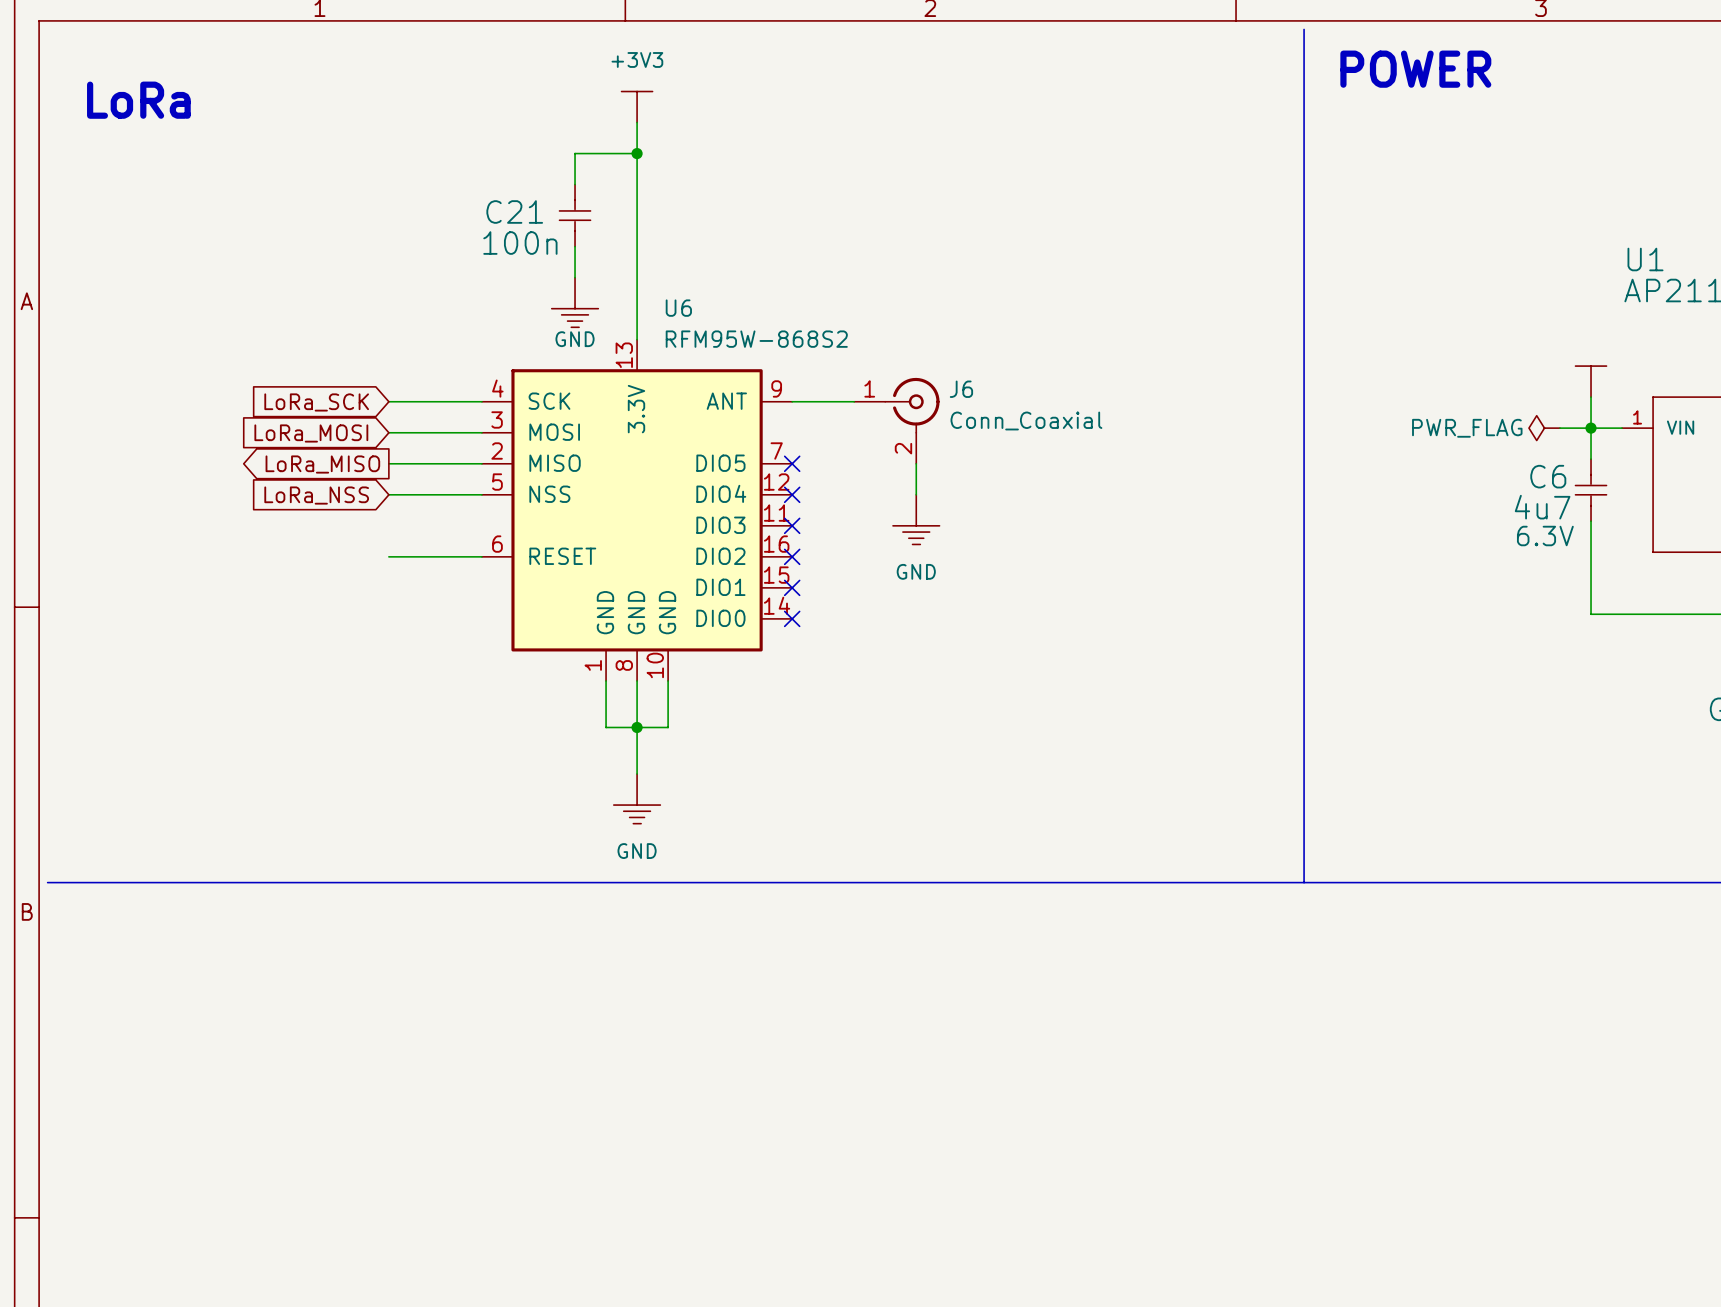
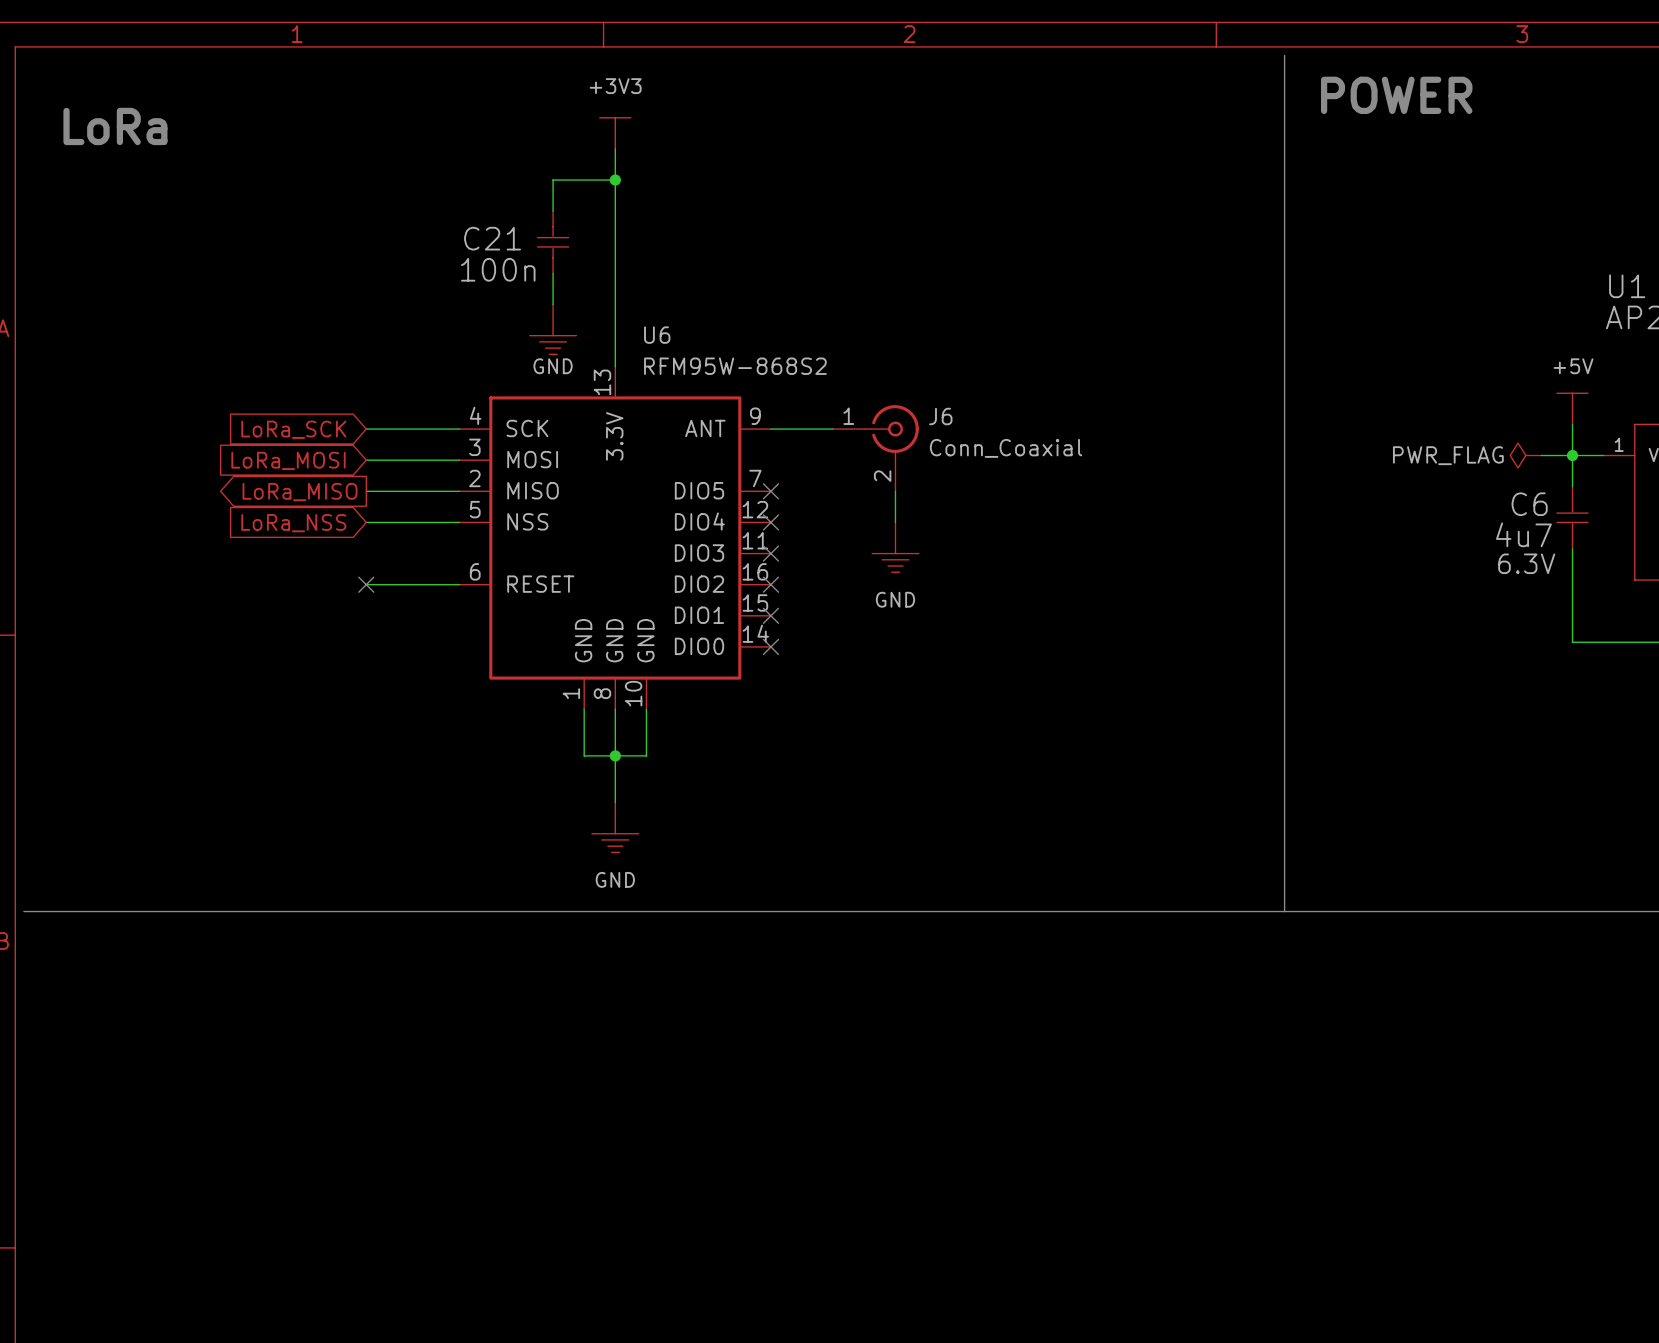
power symbol text: none -> +5V (1573, 366)
no-connect mark: none -> (366, 584)

